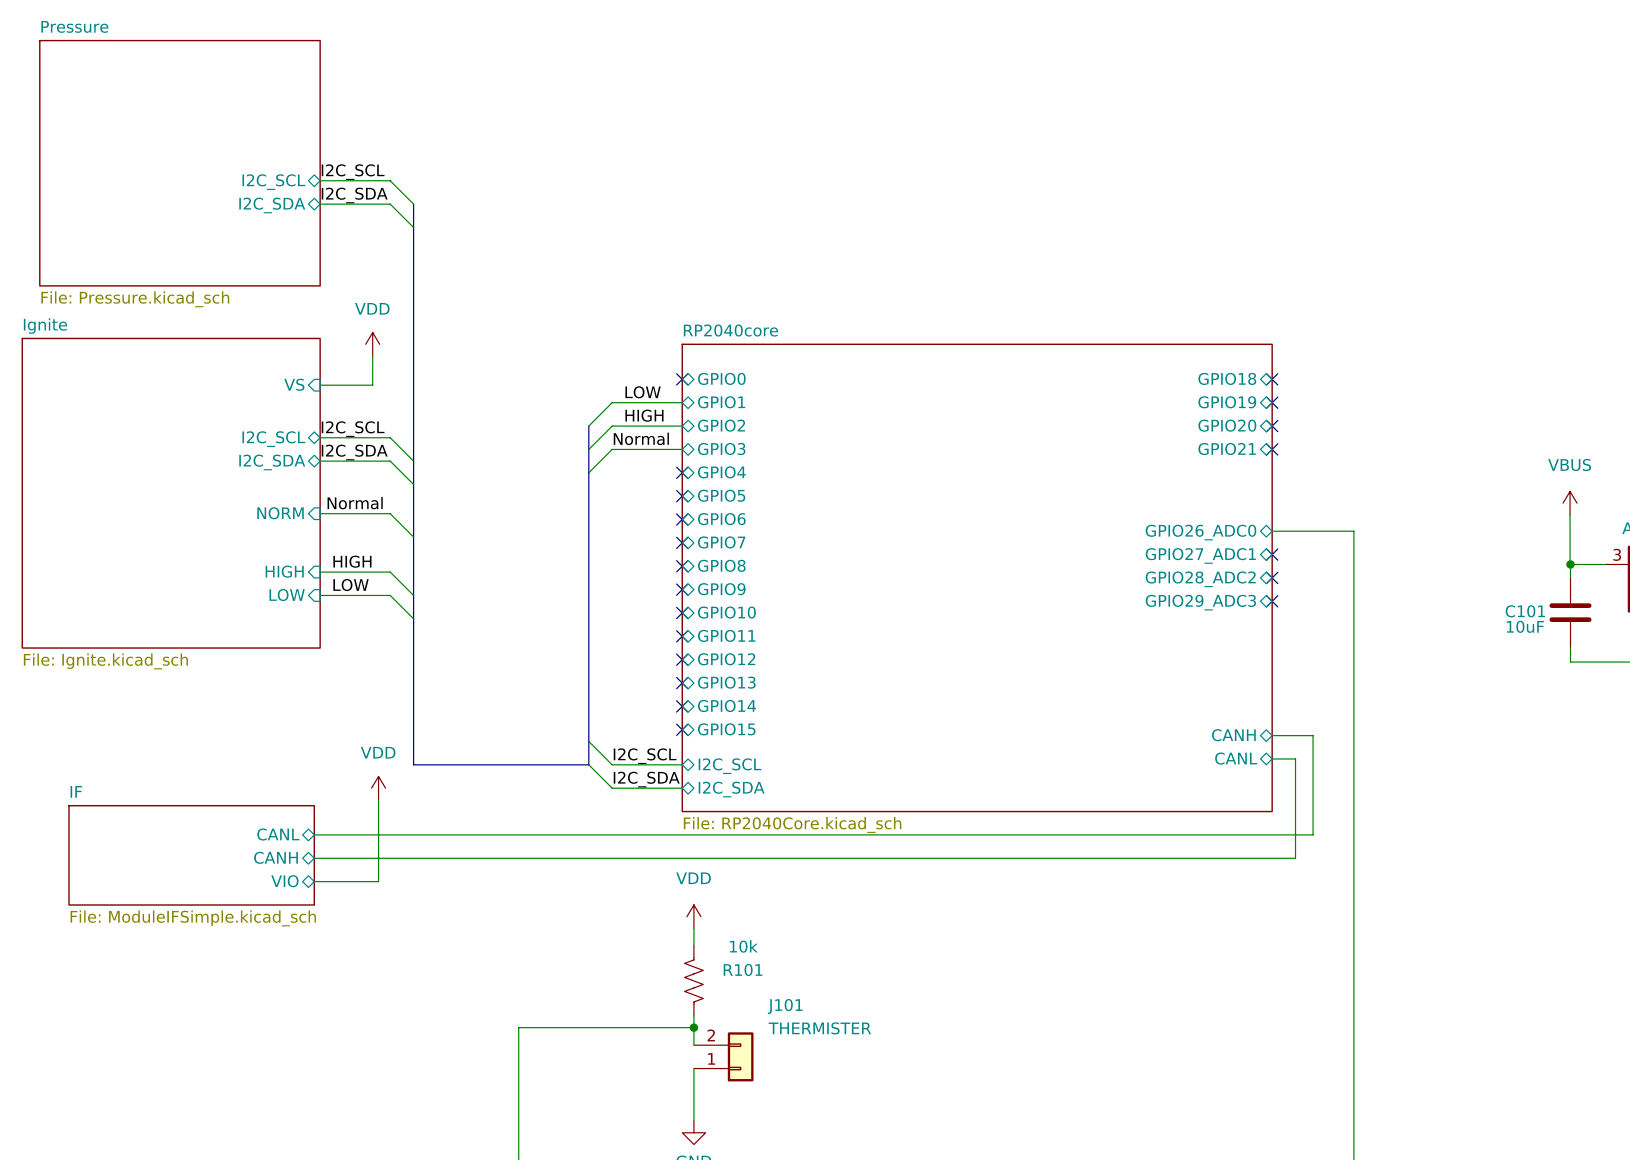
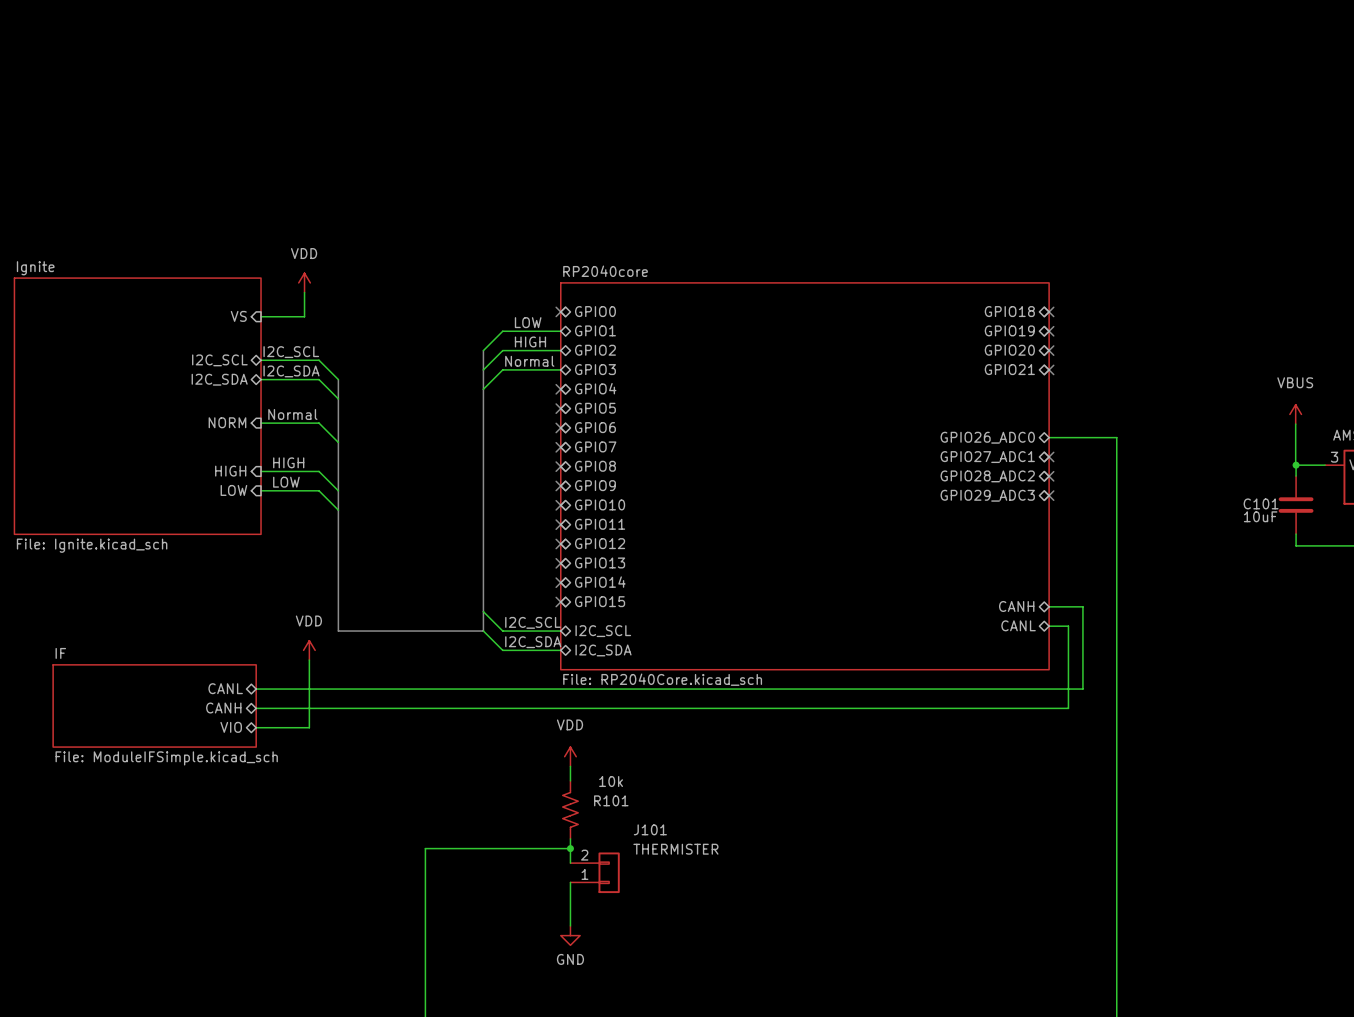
sheet Pressure: File: Pressure.kicad_sch (179, 163) -> none
label: I2C_SCL (353, 172) -> none
wire: (320, 180) (390, 180) (413, 204) -> none
sheet pin: I2C_SCL (273, 182) -> none
label: I2C_SDA (354, 195) -> none
wire: (320, 204) (390, 204) (413, 227) -> none
bus: (413, 204) (413, 461) -> none
sheet pin: I2C_SDA (272, 205) -> none

